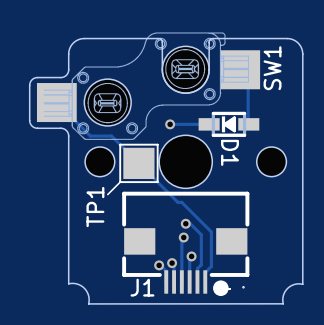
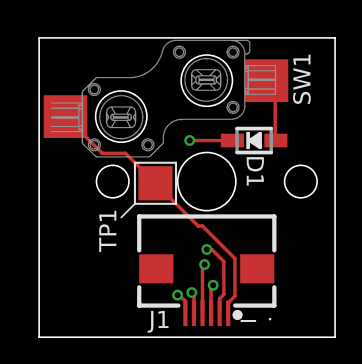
board edge: (302, 54) (299, 44) (288, 38) (211, 38) (209, 42) (208, 72) (206, 81) (194, 91) (182, 92) (171, 88) (164, 78) (162, 42) (160, 38) (82, 38) (74, 41) (70, 47) (68, 70) (66, 75) (61, 77) (35, 77) (31, 80) (29, 85) (31, 125) (36, 128) (62, 128) (68, 134) (68, 283) (77, 284) (84, 288) (88, 295) (88, 303) (283, 303) (283, 295) (287, 288) (294, 284) (302, 284) -> (335, 63) (335, 37) (39, 37) (39, 337) (335, 337) (335, 315)
drawing shape: [213, 280, 229, 297] -> [232, 309, 243, 321]

